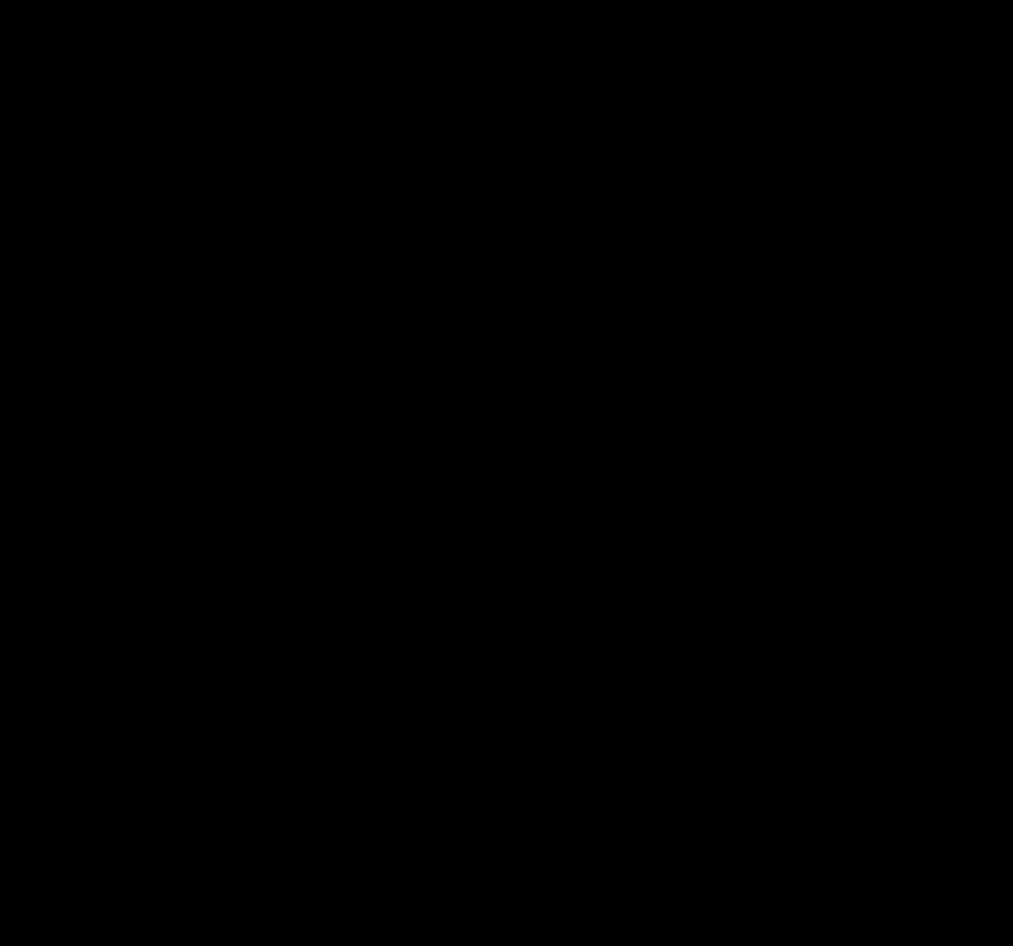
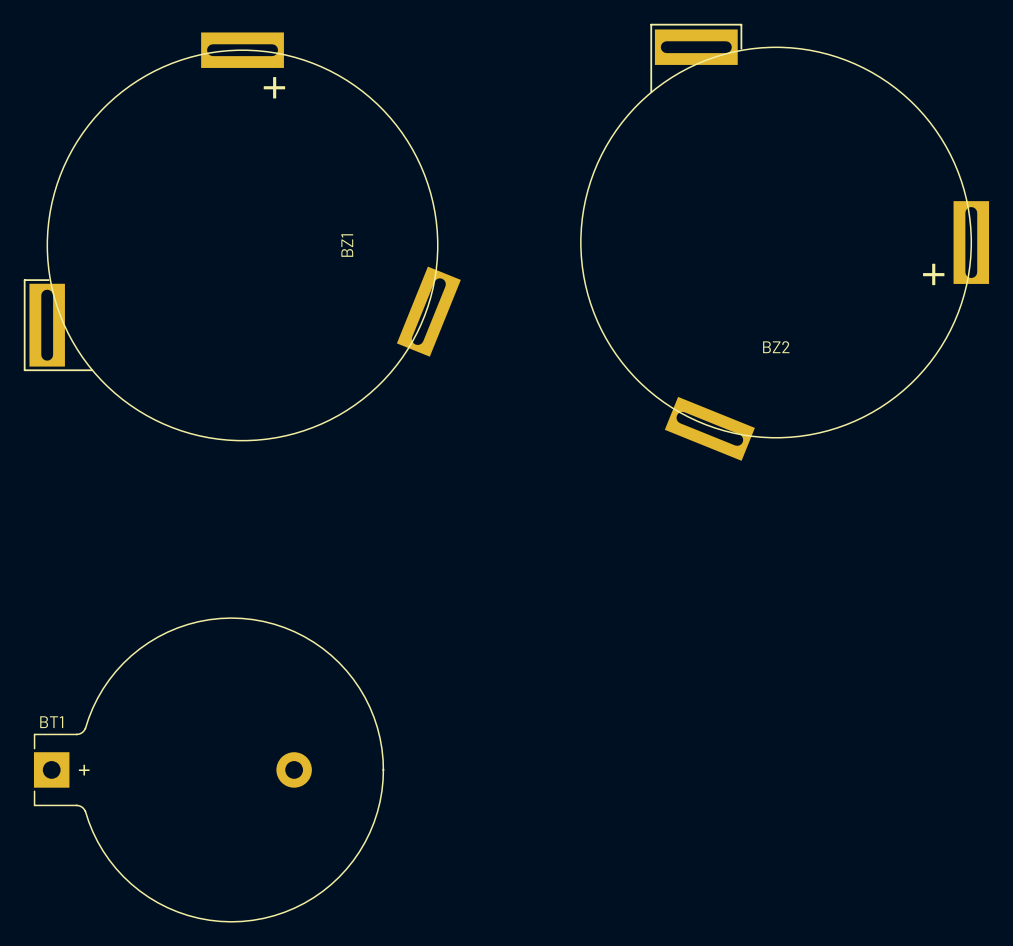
BZ1: none -> (242, 236)
BZ2: none -> (784, 242)
BT1: none -> (208, 769)

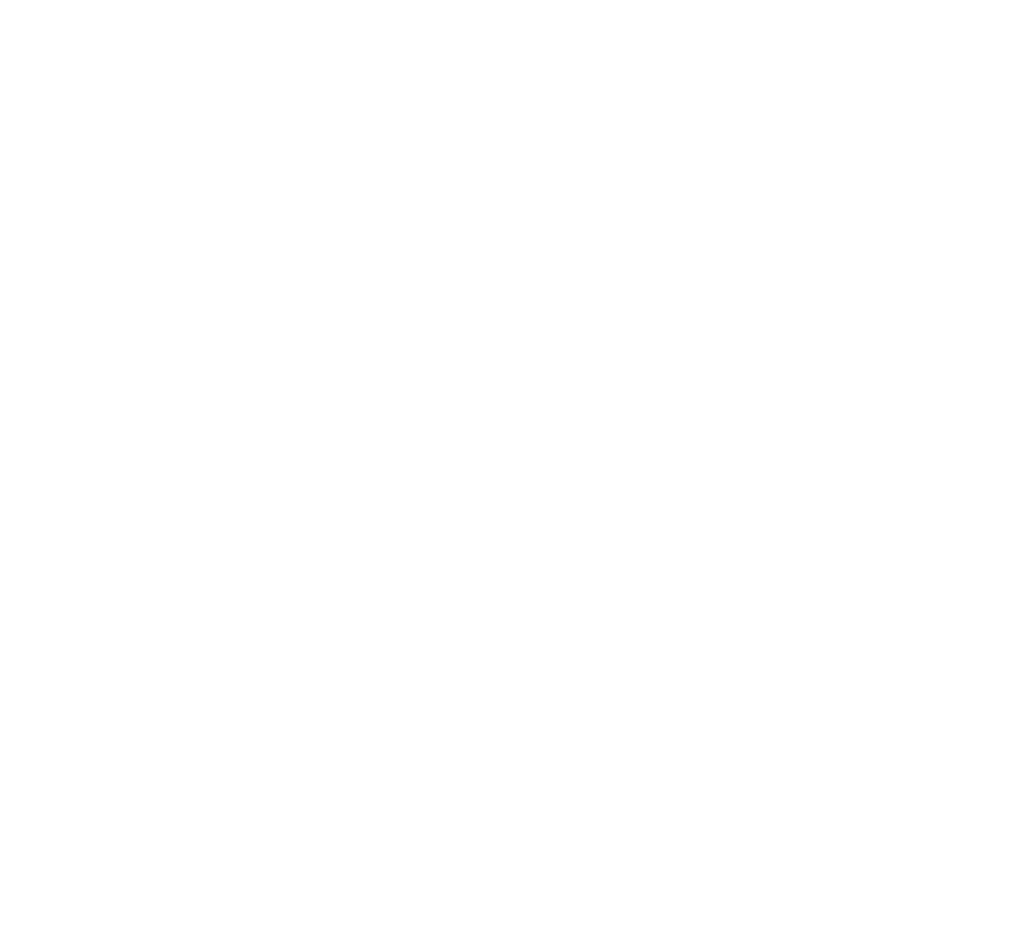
BZ1: (242, 236) -> none
BZ2: (784, 242) -> none
BT1: (208, 769) -> none

